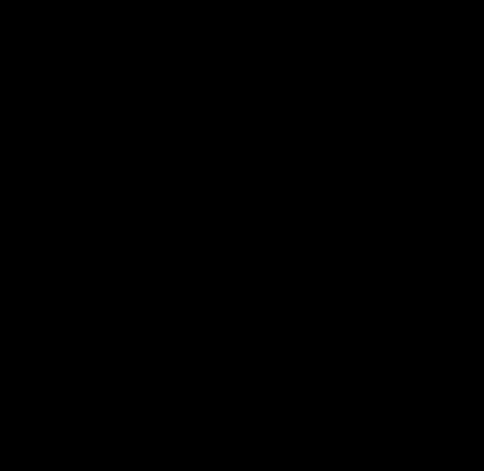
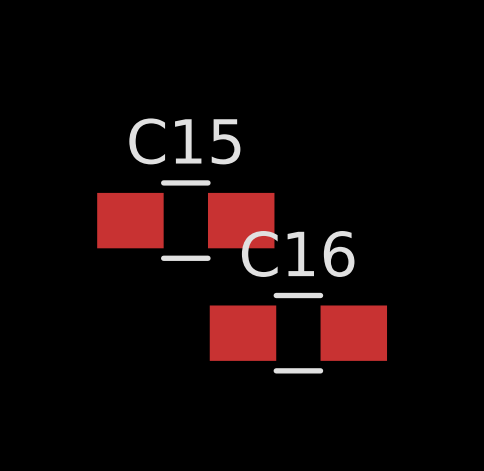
C15: none -> (185, 220)
C16: none -> (298, 333)

